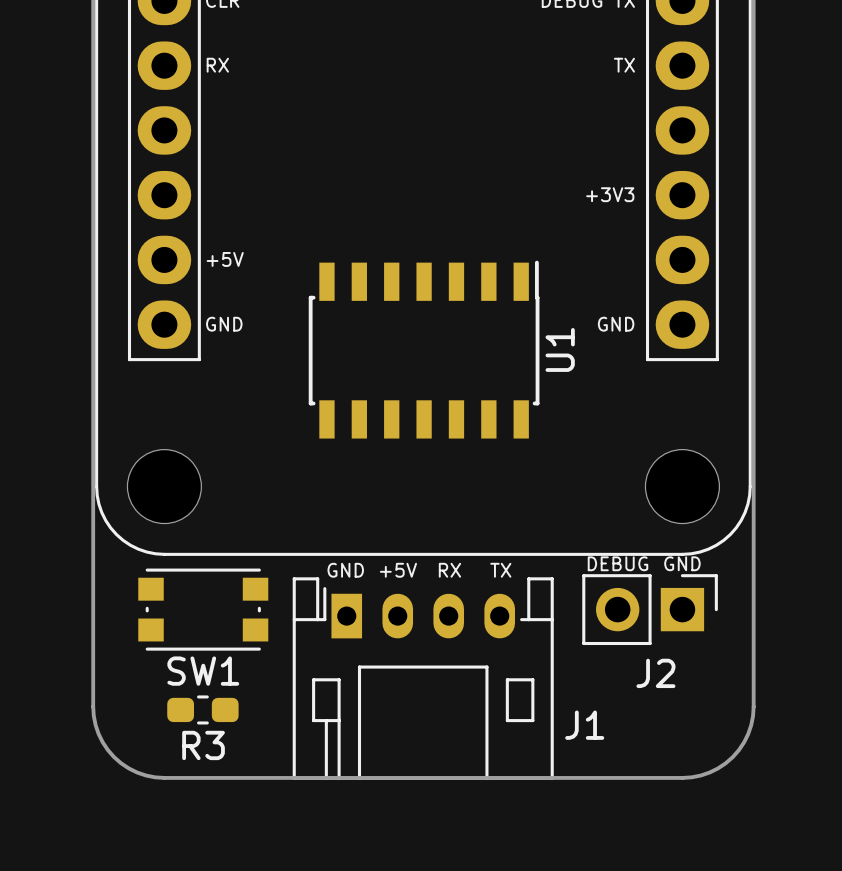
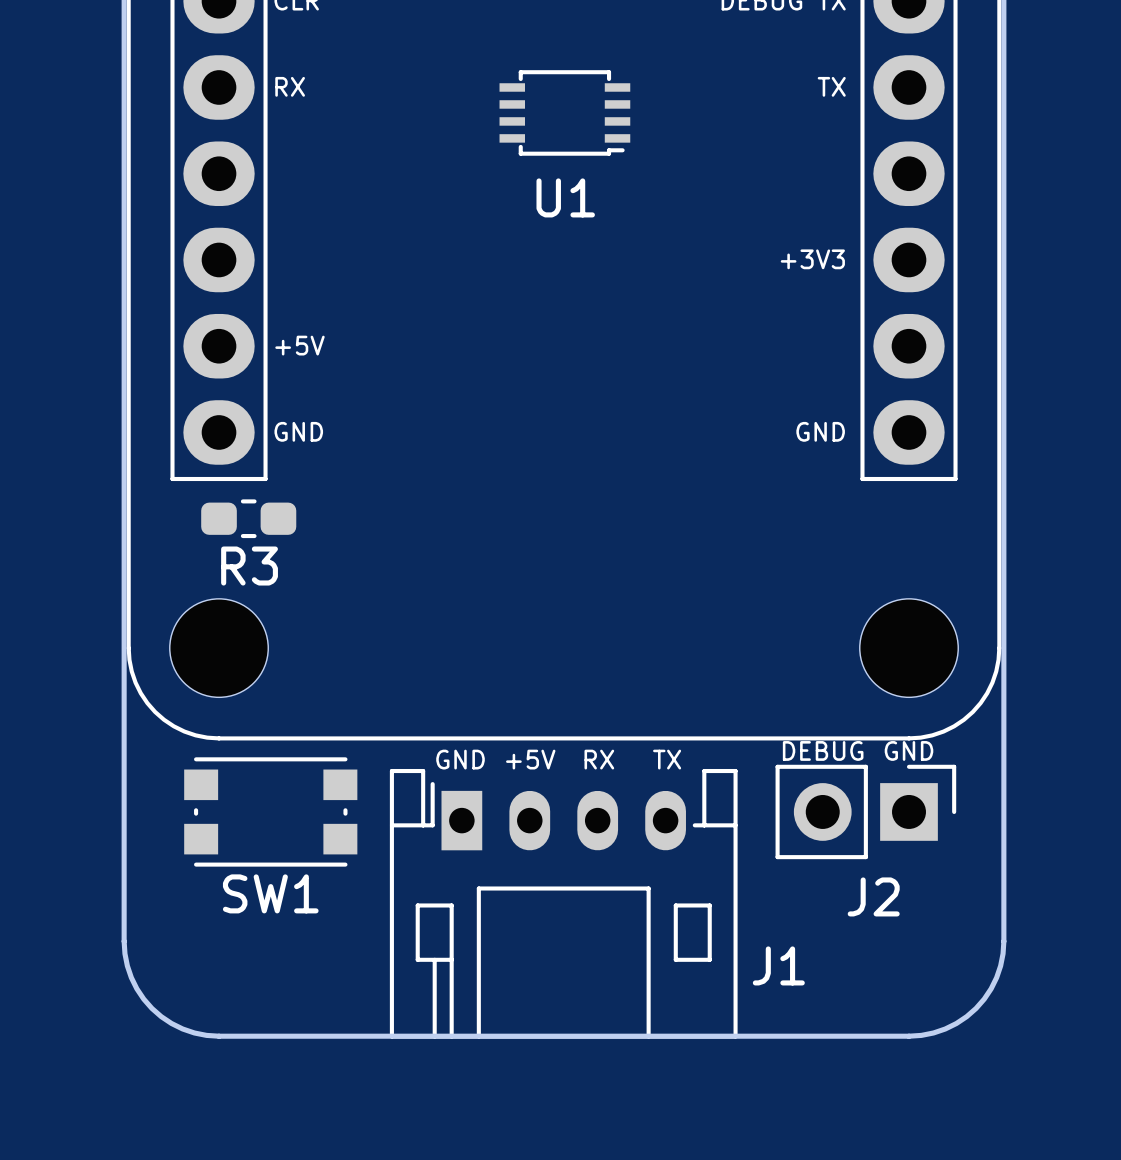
U1 footprint: [308, 260, 540, 439] -> [499, 70, 631, 156]
U1 name position: U1 (560, 349) -> U1 (565, 197)
R3 position: (202, 709) -> (248, 518)

